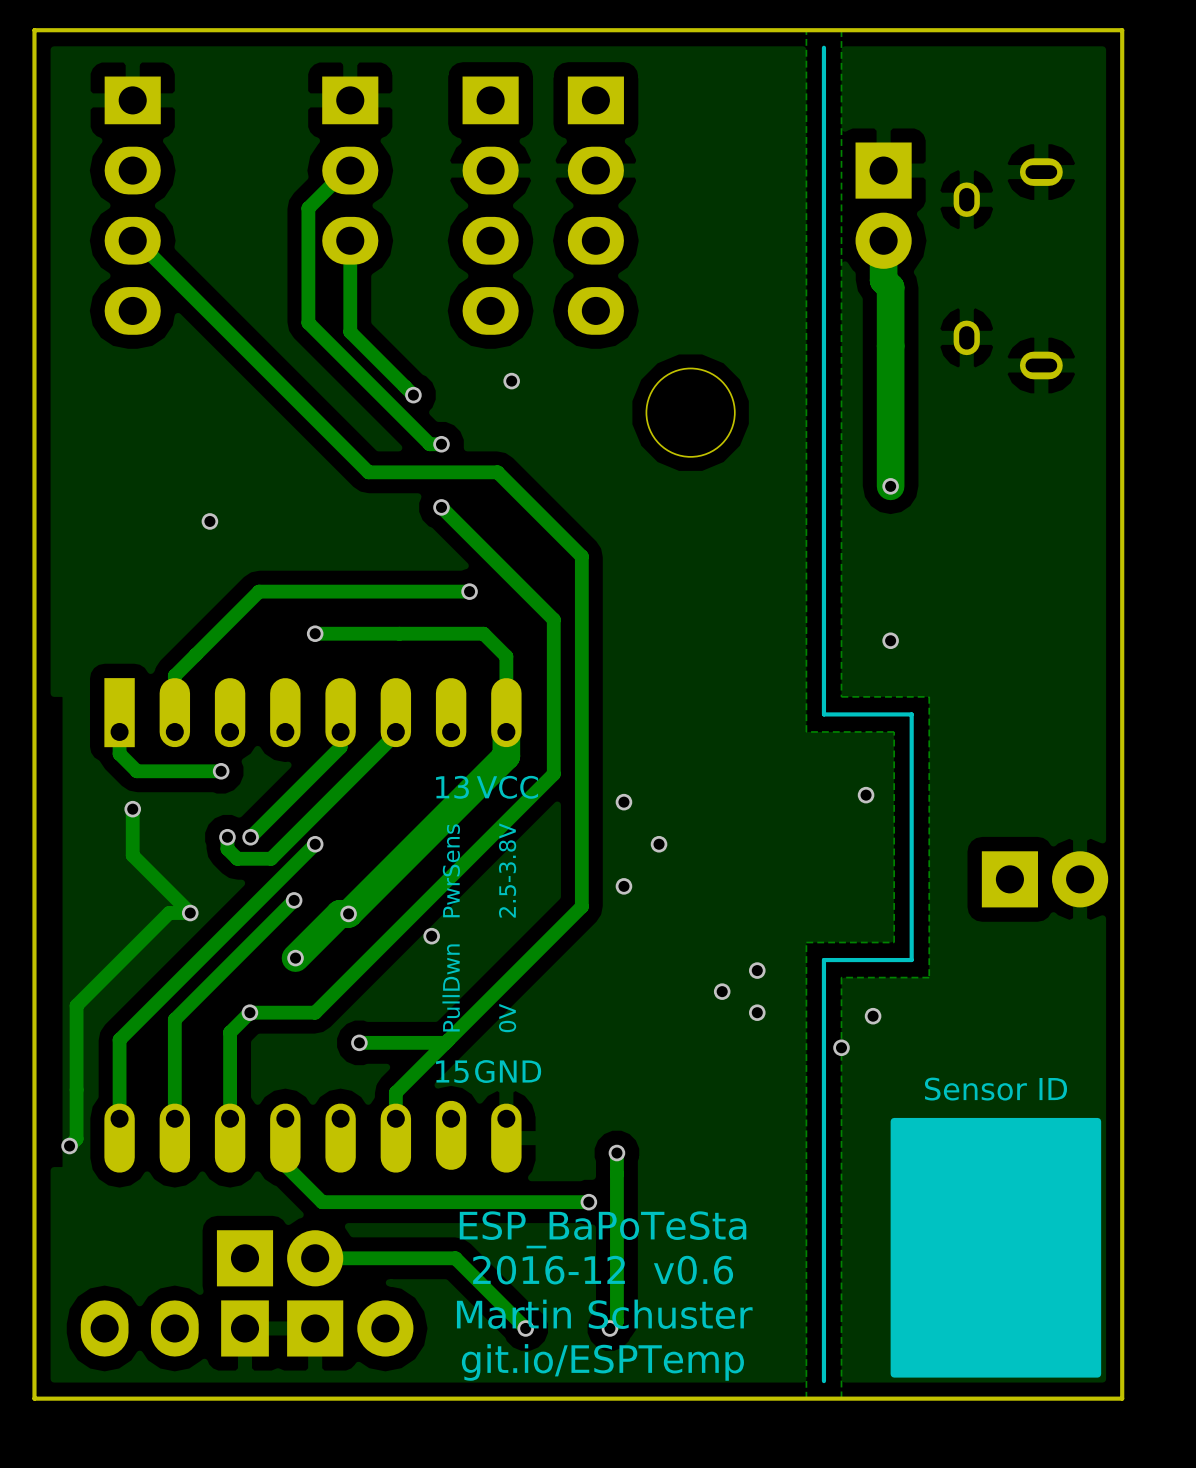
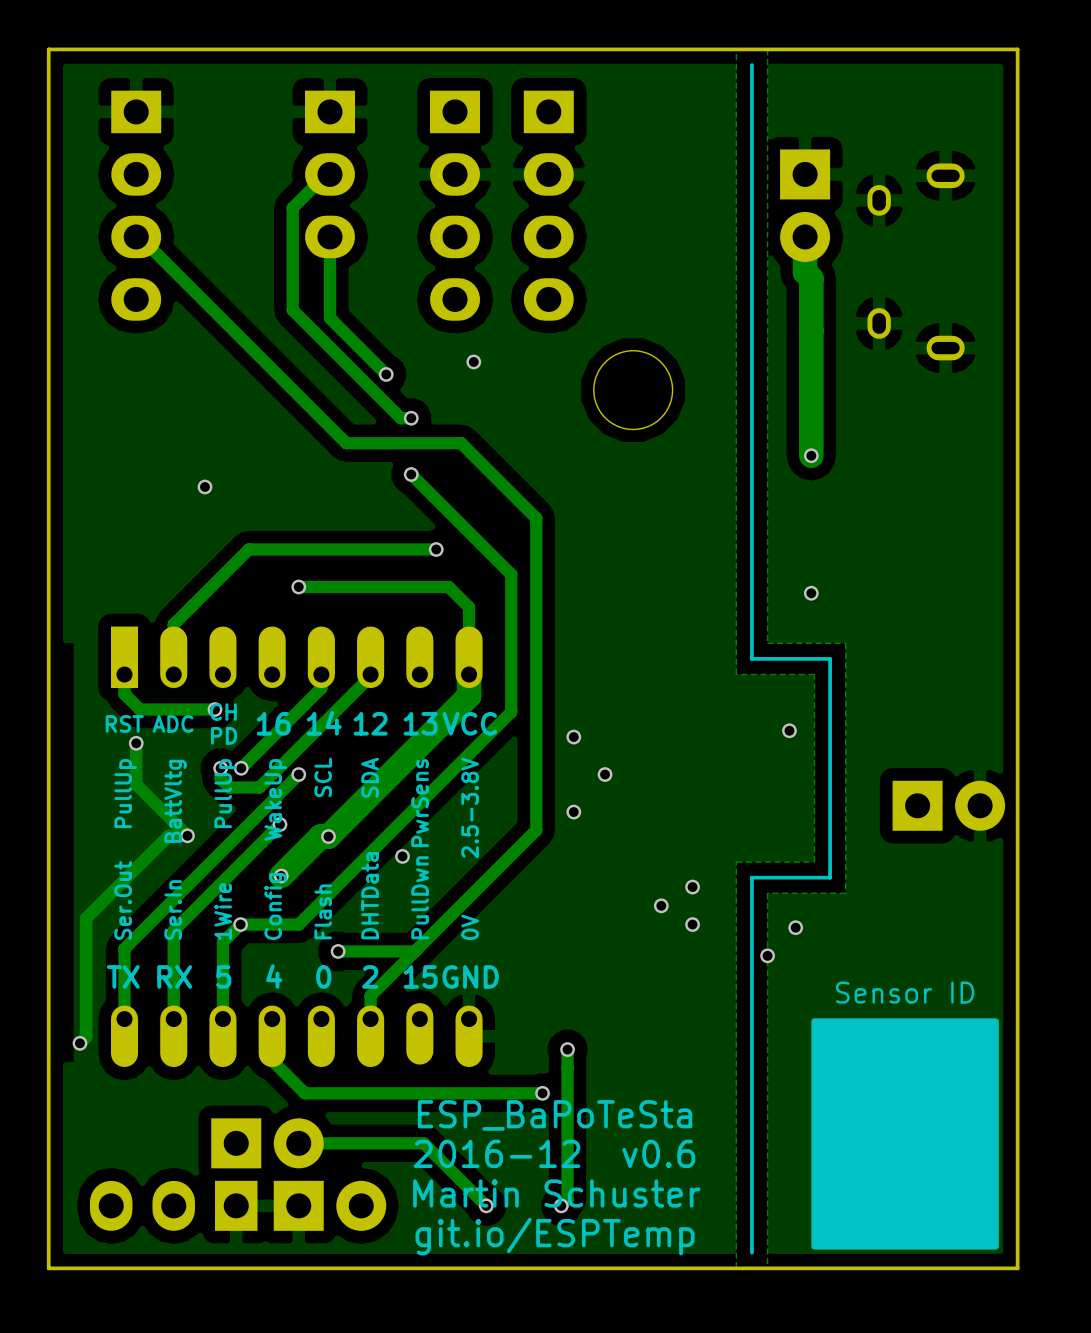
text: none -> CH (223, 712)
text: none -> RST (124, 723)
text: none -> ADC (173, 723)
text: none -> 16 (273, 723)
text: none -> 14 (324, 723)
text: none -> 12 (370, 723)
text: none -> PD (224, 735)
text: none -> SCL (323, 777)
text: none -> SDA (370, 777)
text: none -> PullUp (125, 793)
text: none -> PullUp (225, 793)
text: none -> BattVltg (175, 801)
text: none -> WakeUp (275, 799)
text: none -> DHTData (370, 895)
text: none -> Ser.Out (123, 900)
text: none -> Config (275, 906)
text: none -> 1Wire (223, 911)
text: none -> Ser.In (173, 910)
text: none -> Flash (323, 911)
text: none -> TX (123, 976)
text: none -> RX (174, 976)
text: none -> 5 (223, 976)
text: none -> 4 (274, 976)
text: none -> 0 (323, 976)
text: none -> 2 (370, 976)

